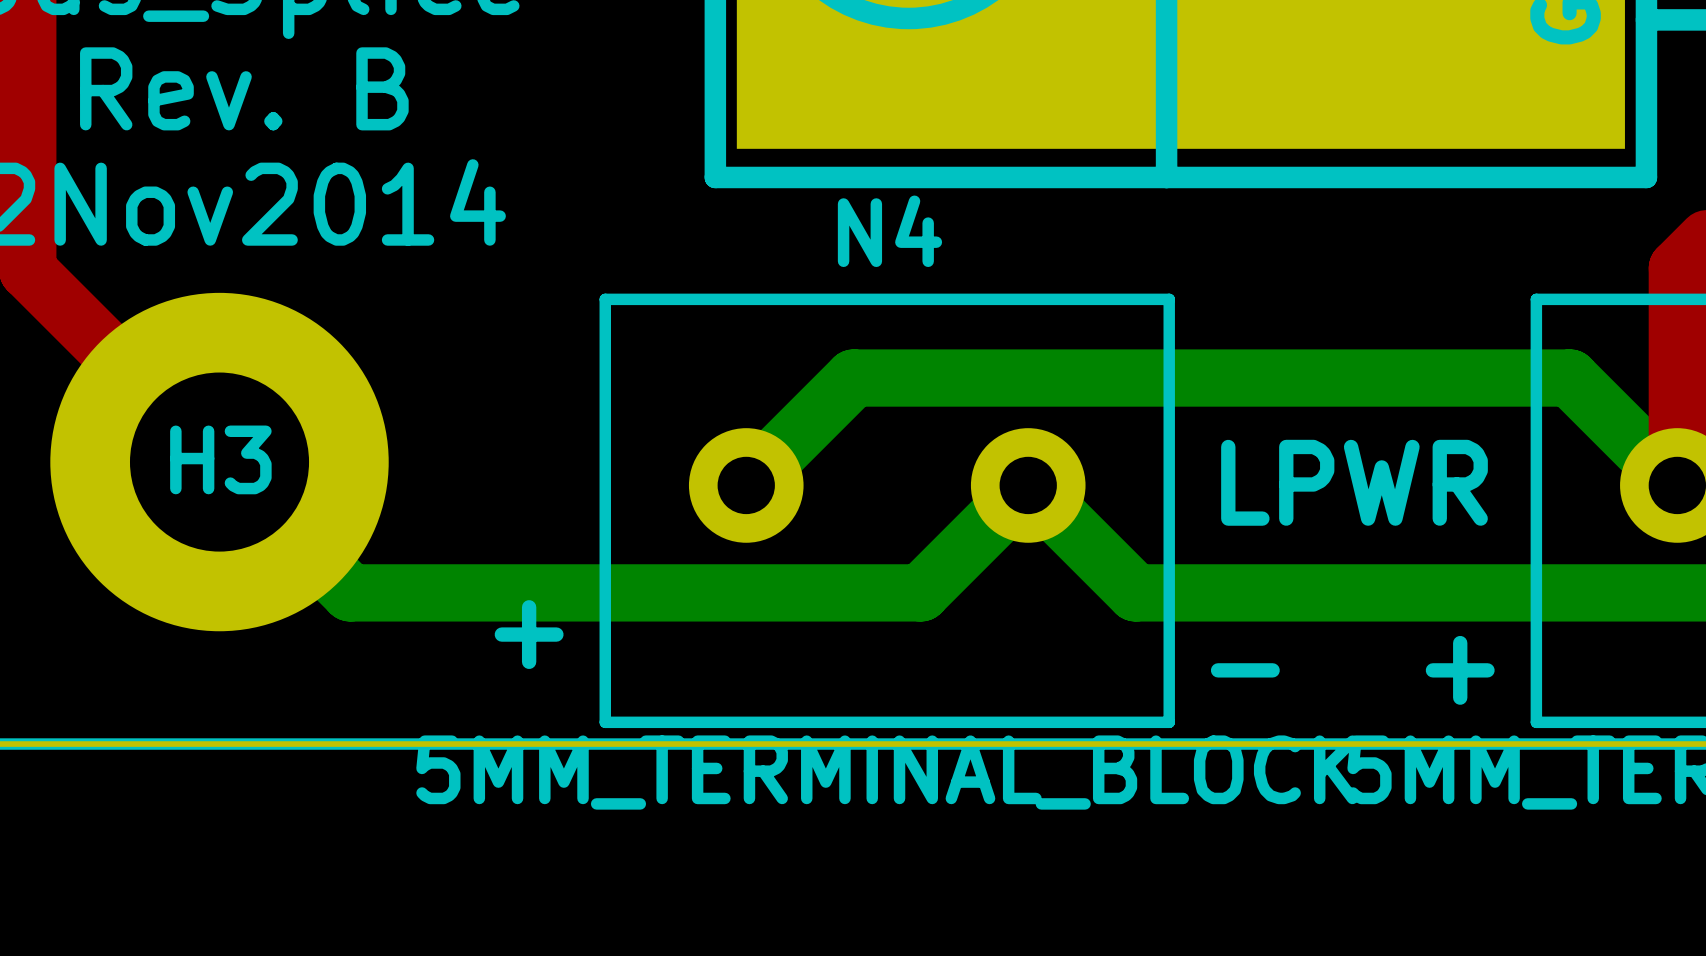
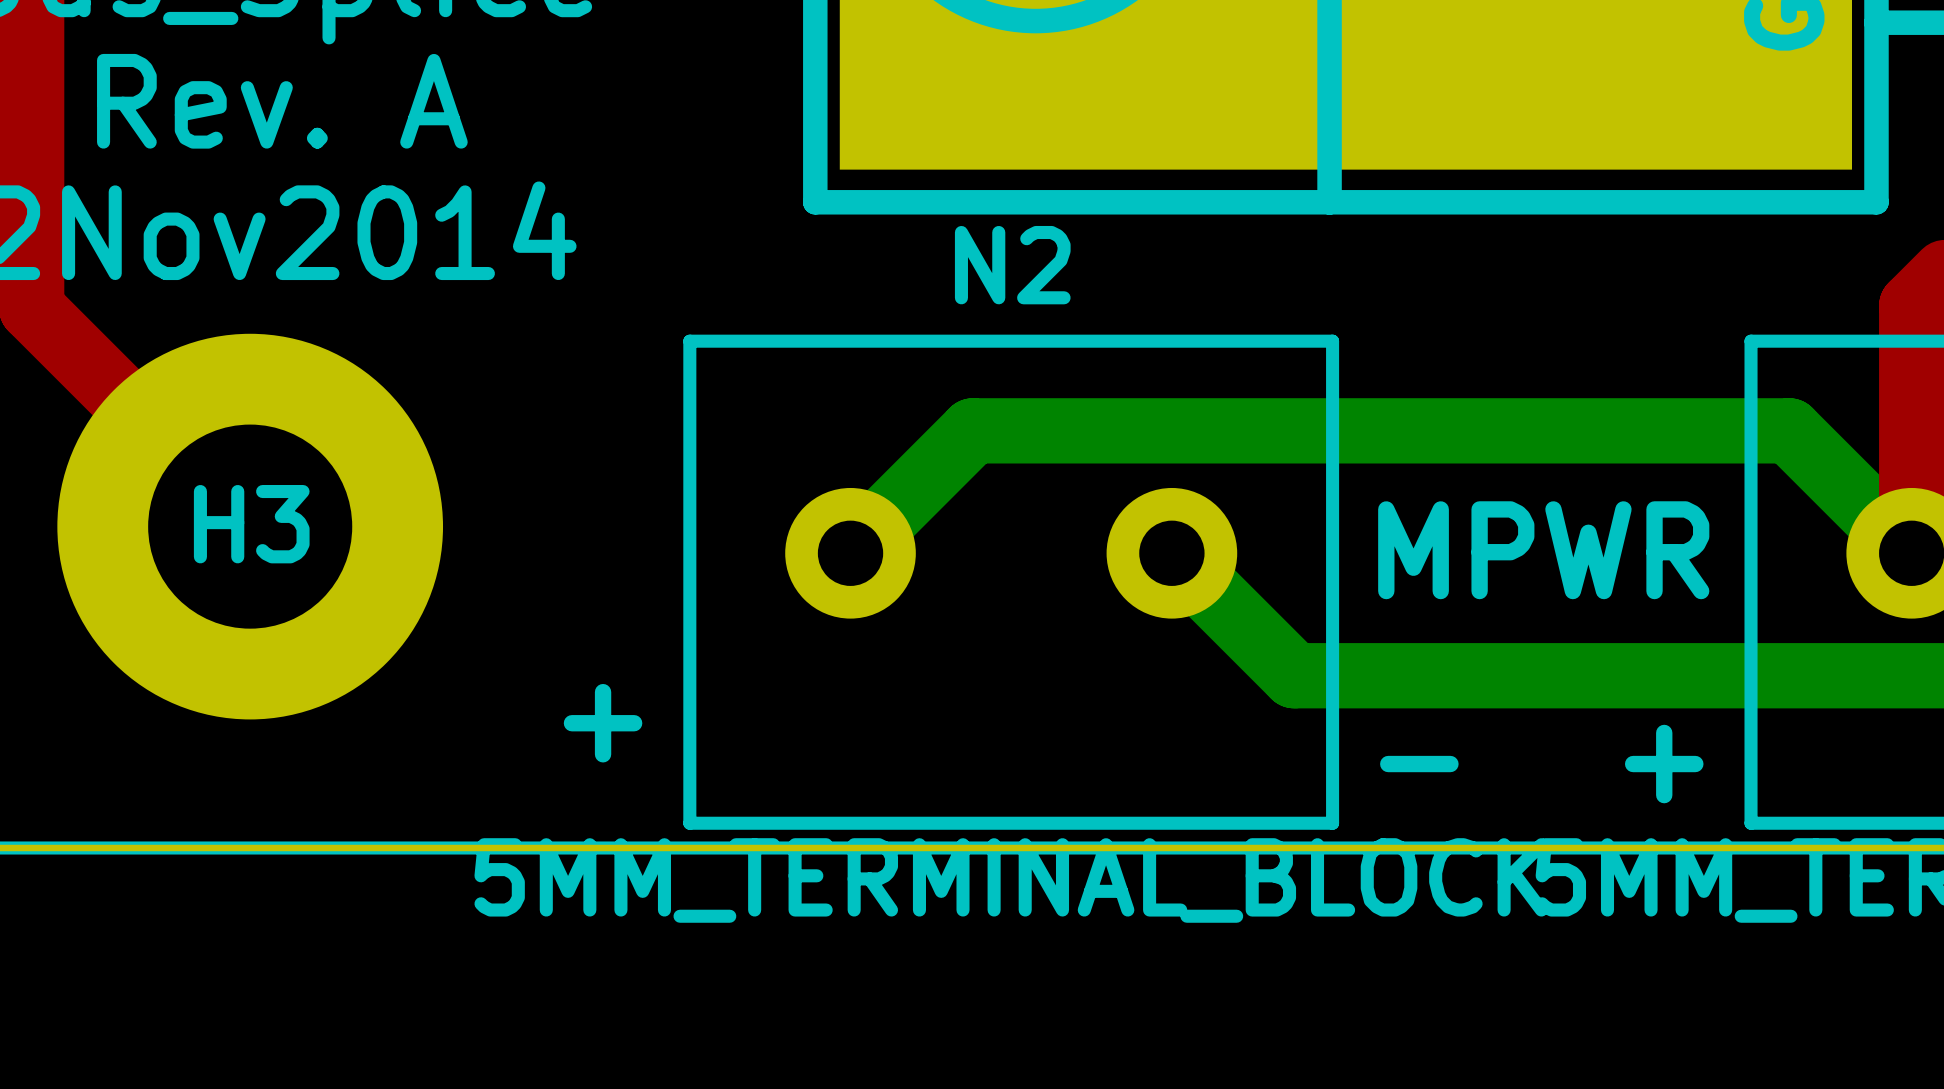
text: Rev. B (244, 88) -> Rev. A (282, 101)
N4 name: N4 (889, 231) -> N2 (1012, 265)
bottom track: (219, 462) (350, 592) (920, 592) (1028, 485) -> none
text: LPWR (1354, 482) -> MPWR (1543, 550)

